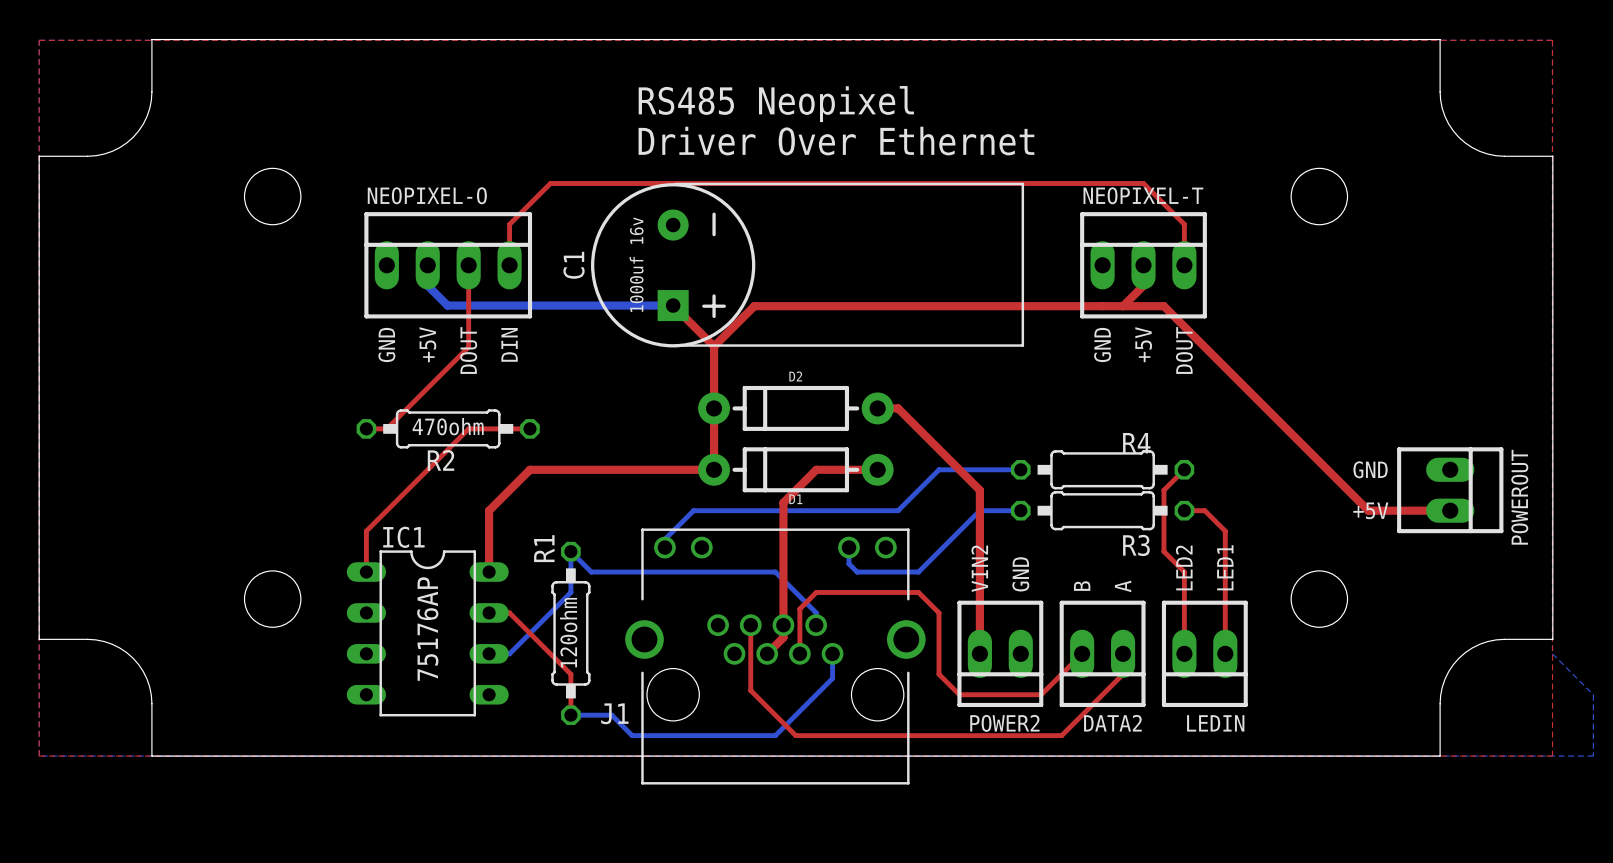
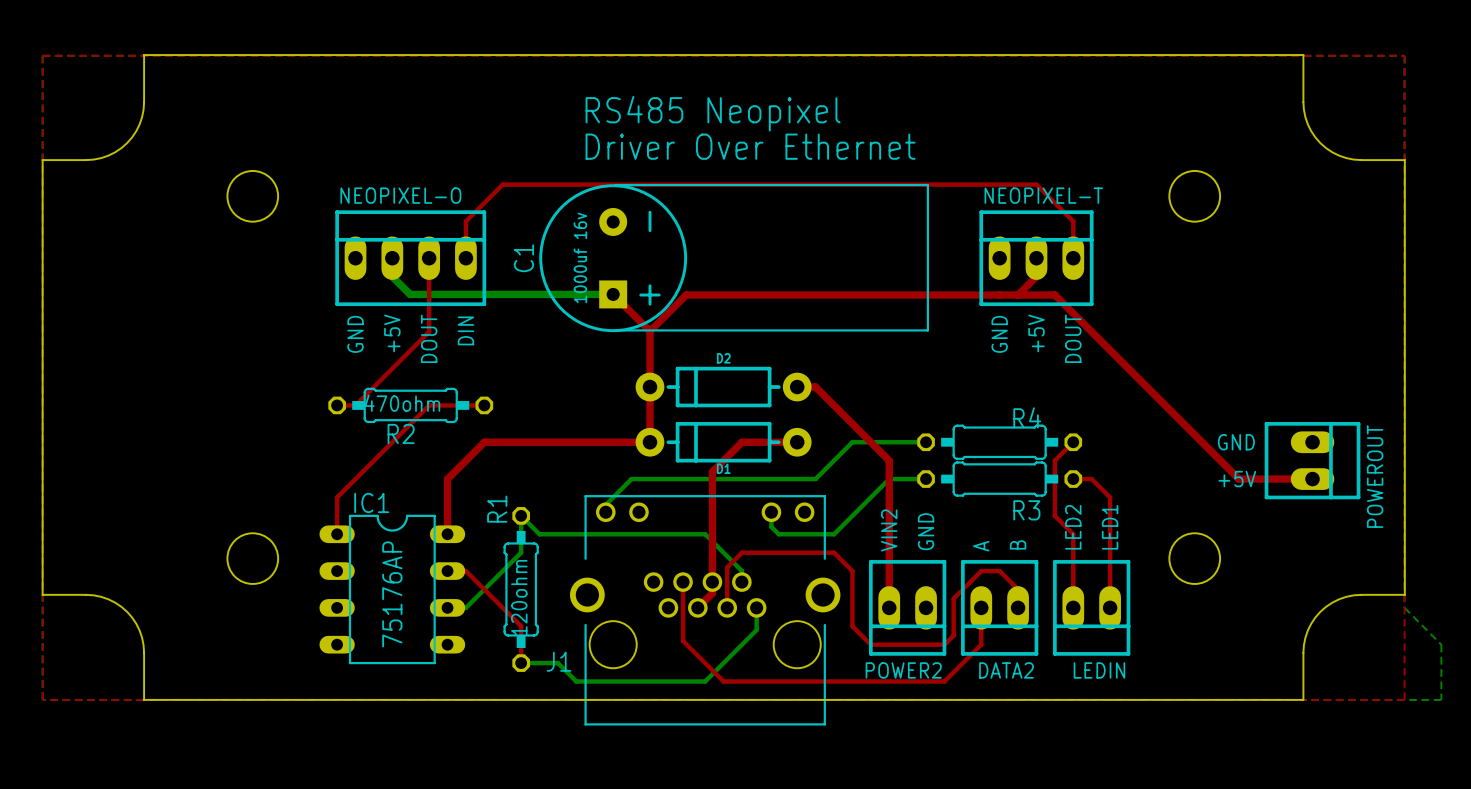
text: B (1082, 586) -> A (981, 546)
text: A (1123, 586) -> B (1018, 544)
top track: (1082, 653) (1051, 684) -> (1018, 607) (1018, 589) (999, 571) (981, 571) (953, 598) (953, 635)
top track: (1123, 653) (1123, 674) (1061, 735) (1041, 735) -> (981, 607) (981, 644) (944, 681)

